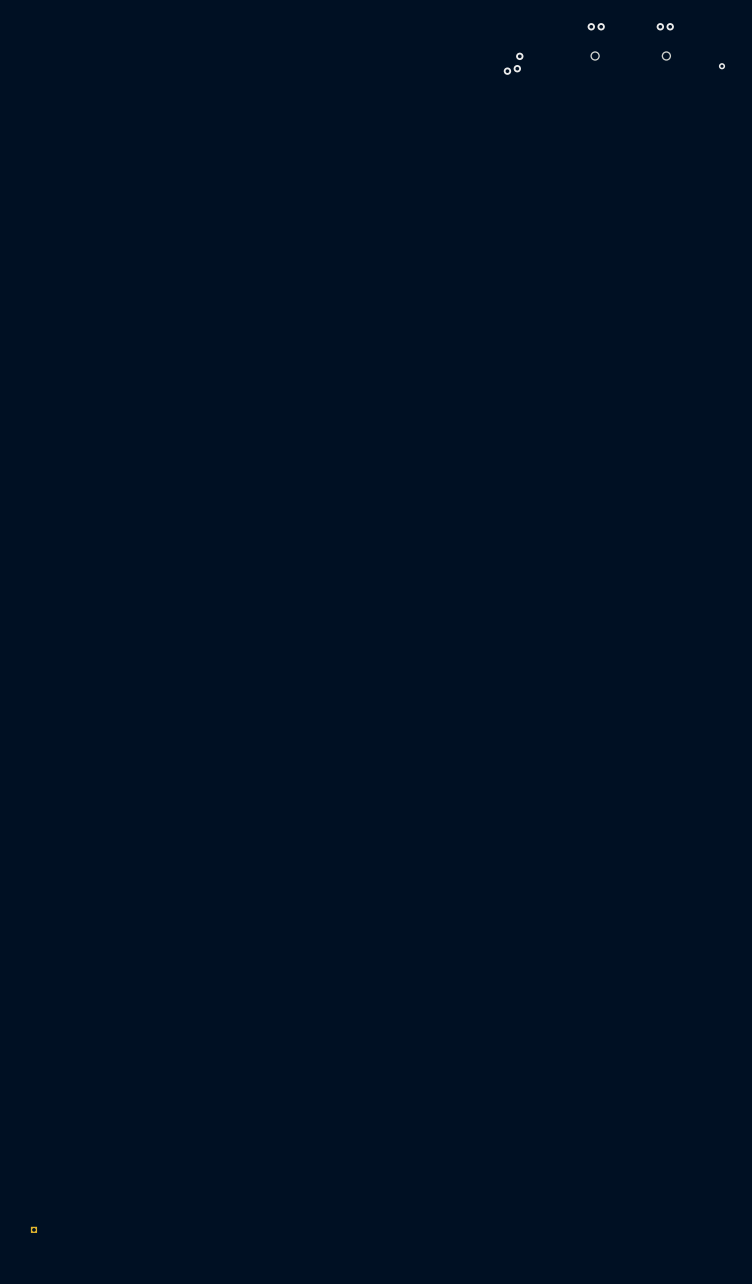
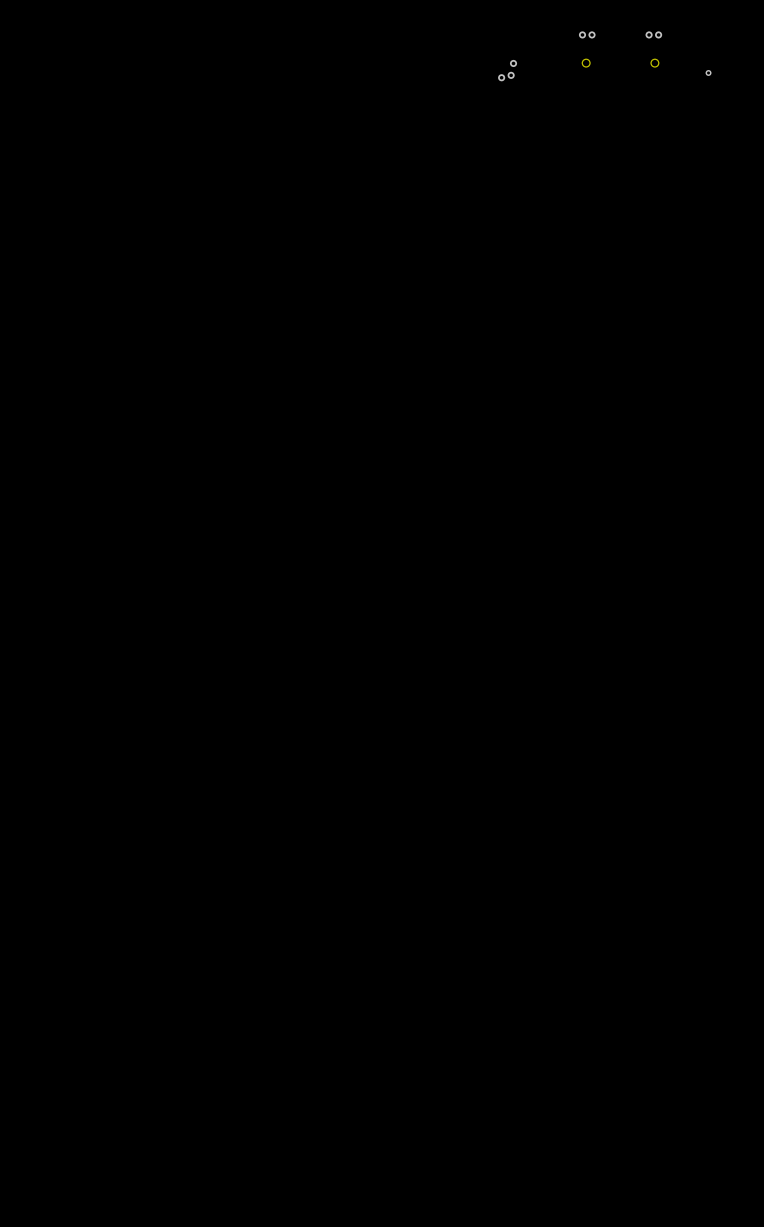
part: (33, 1229) -> none

